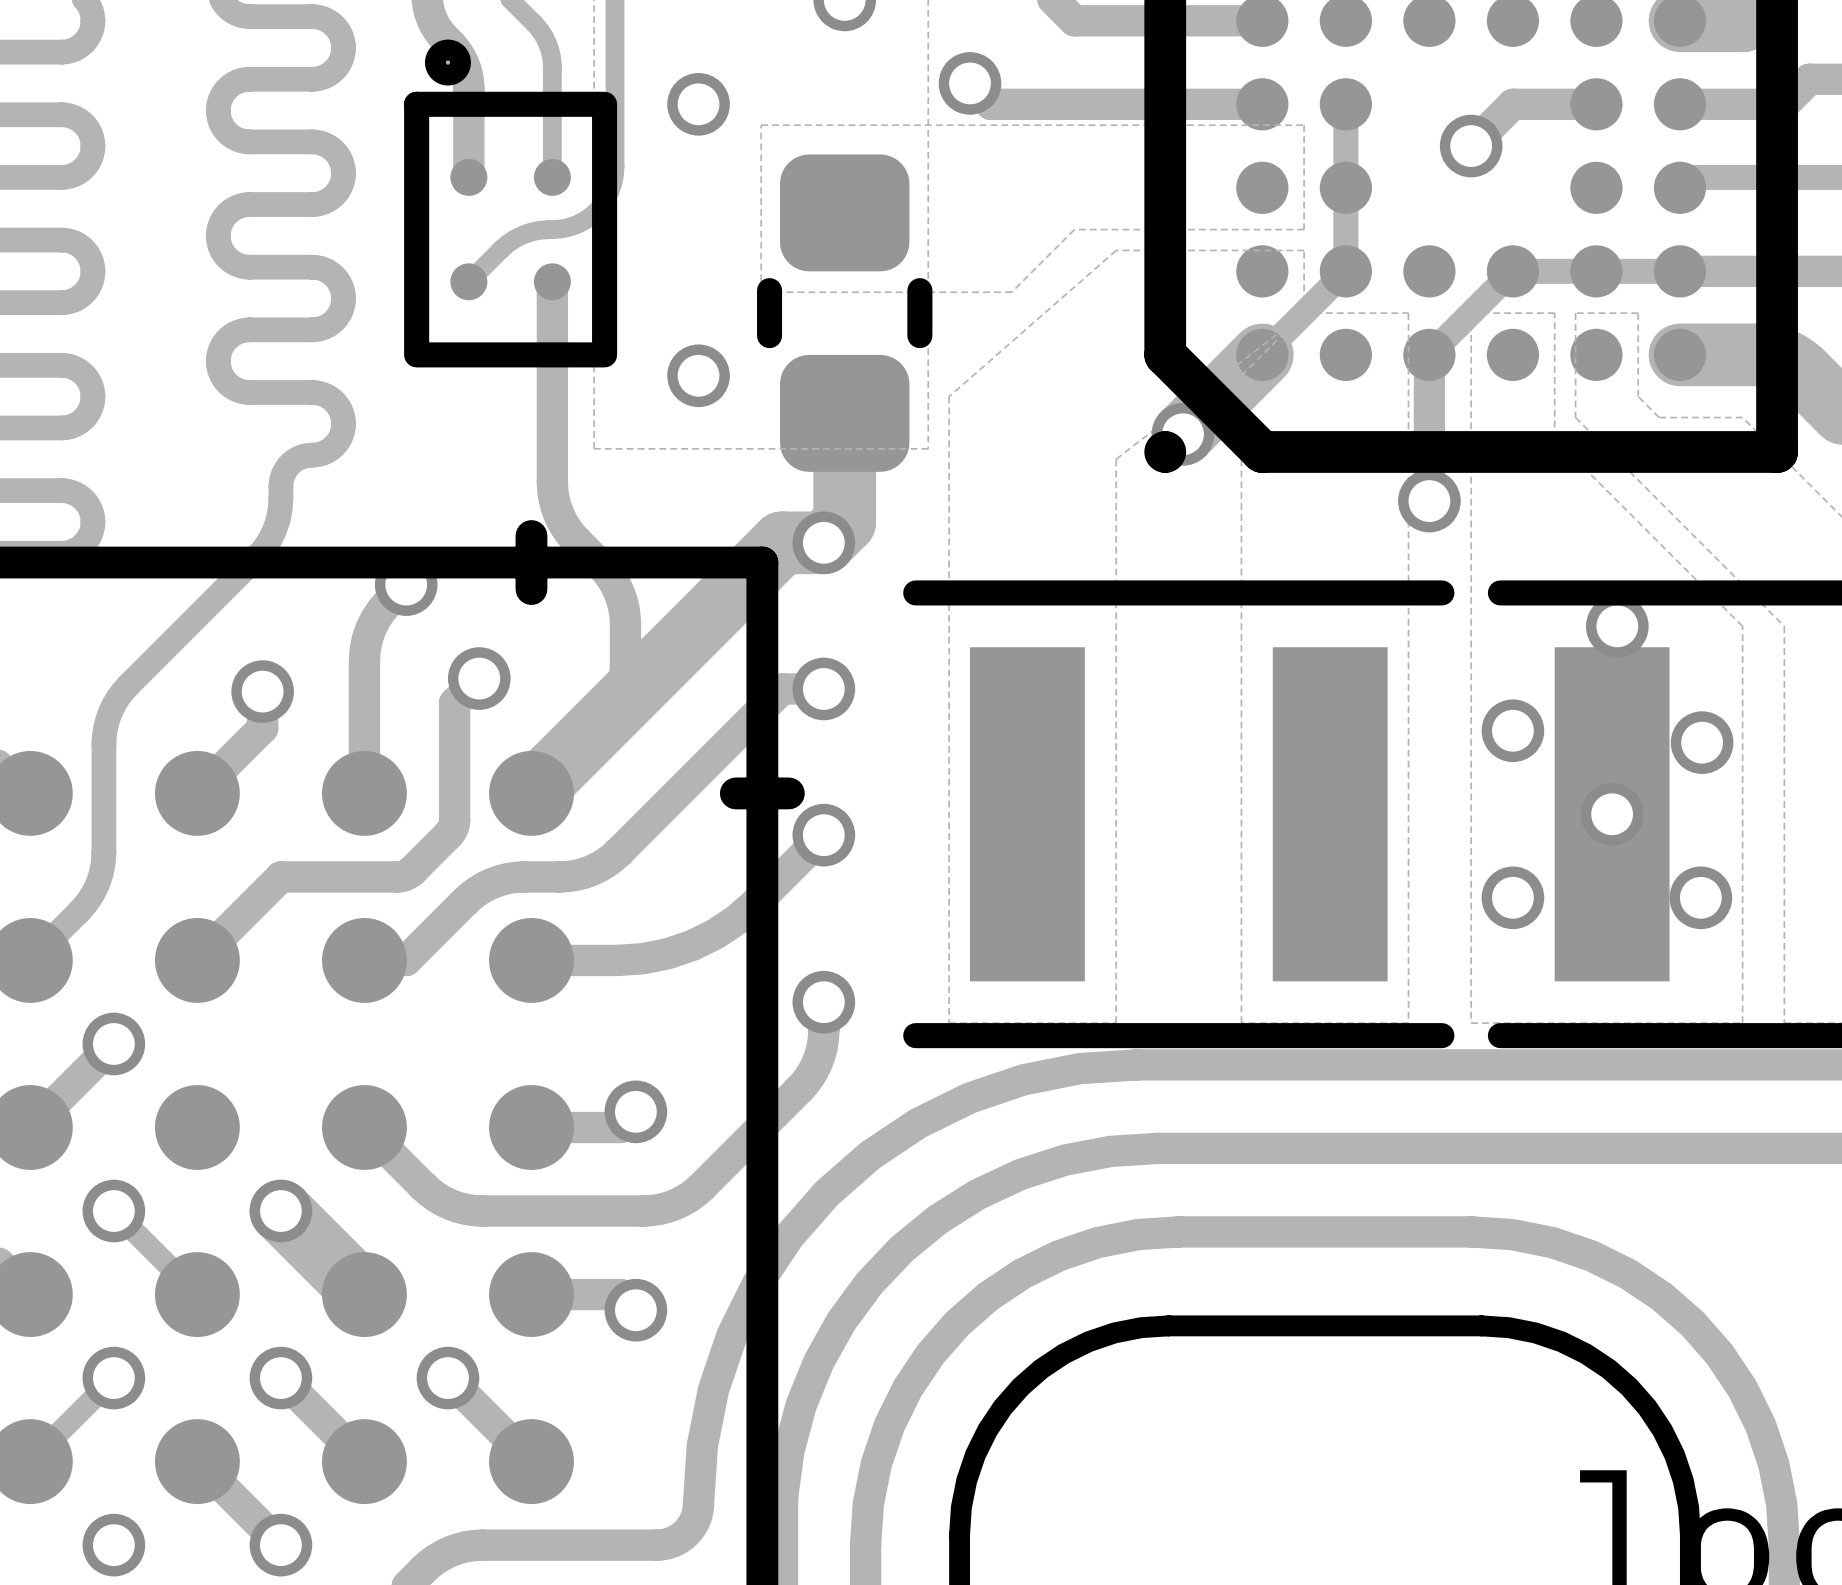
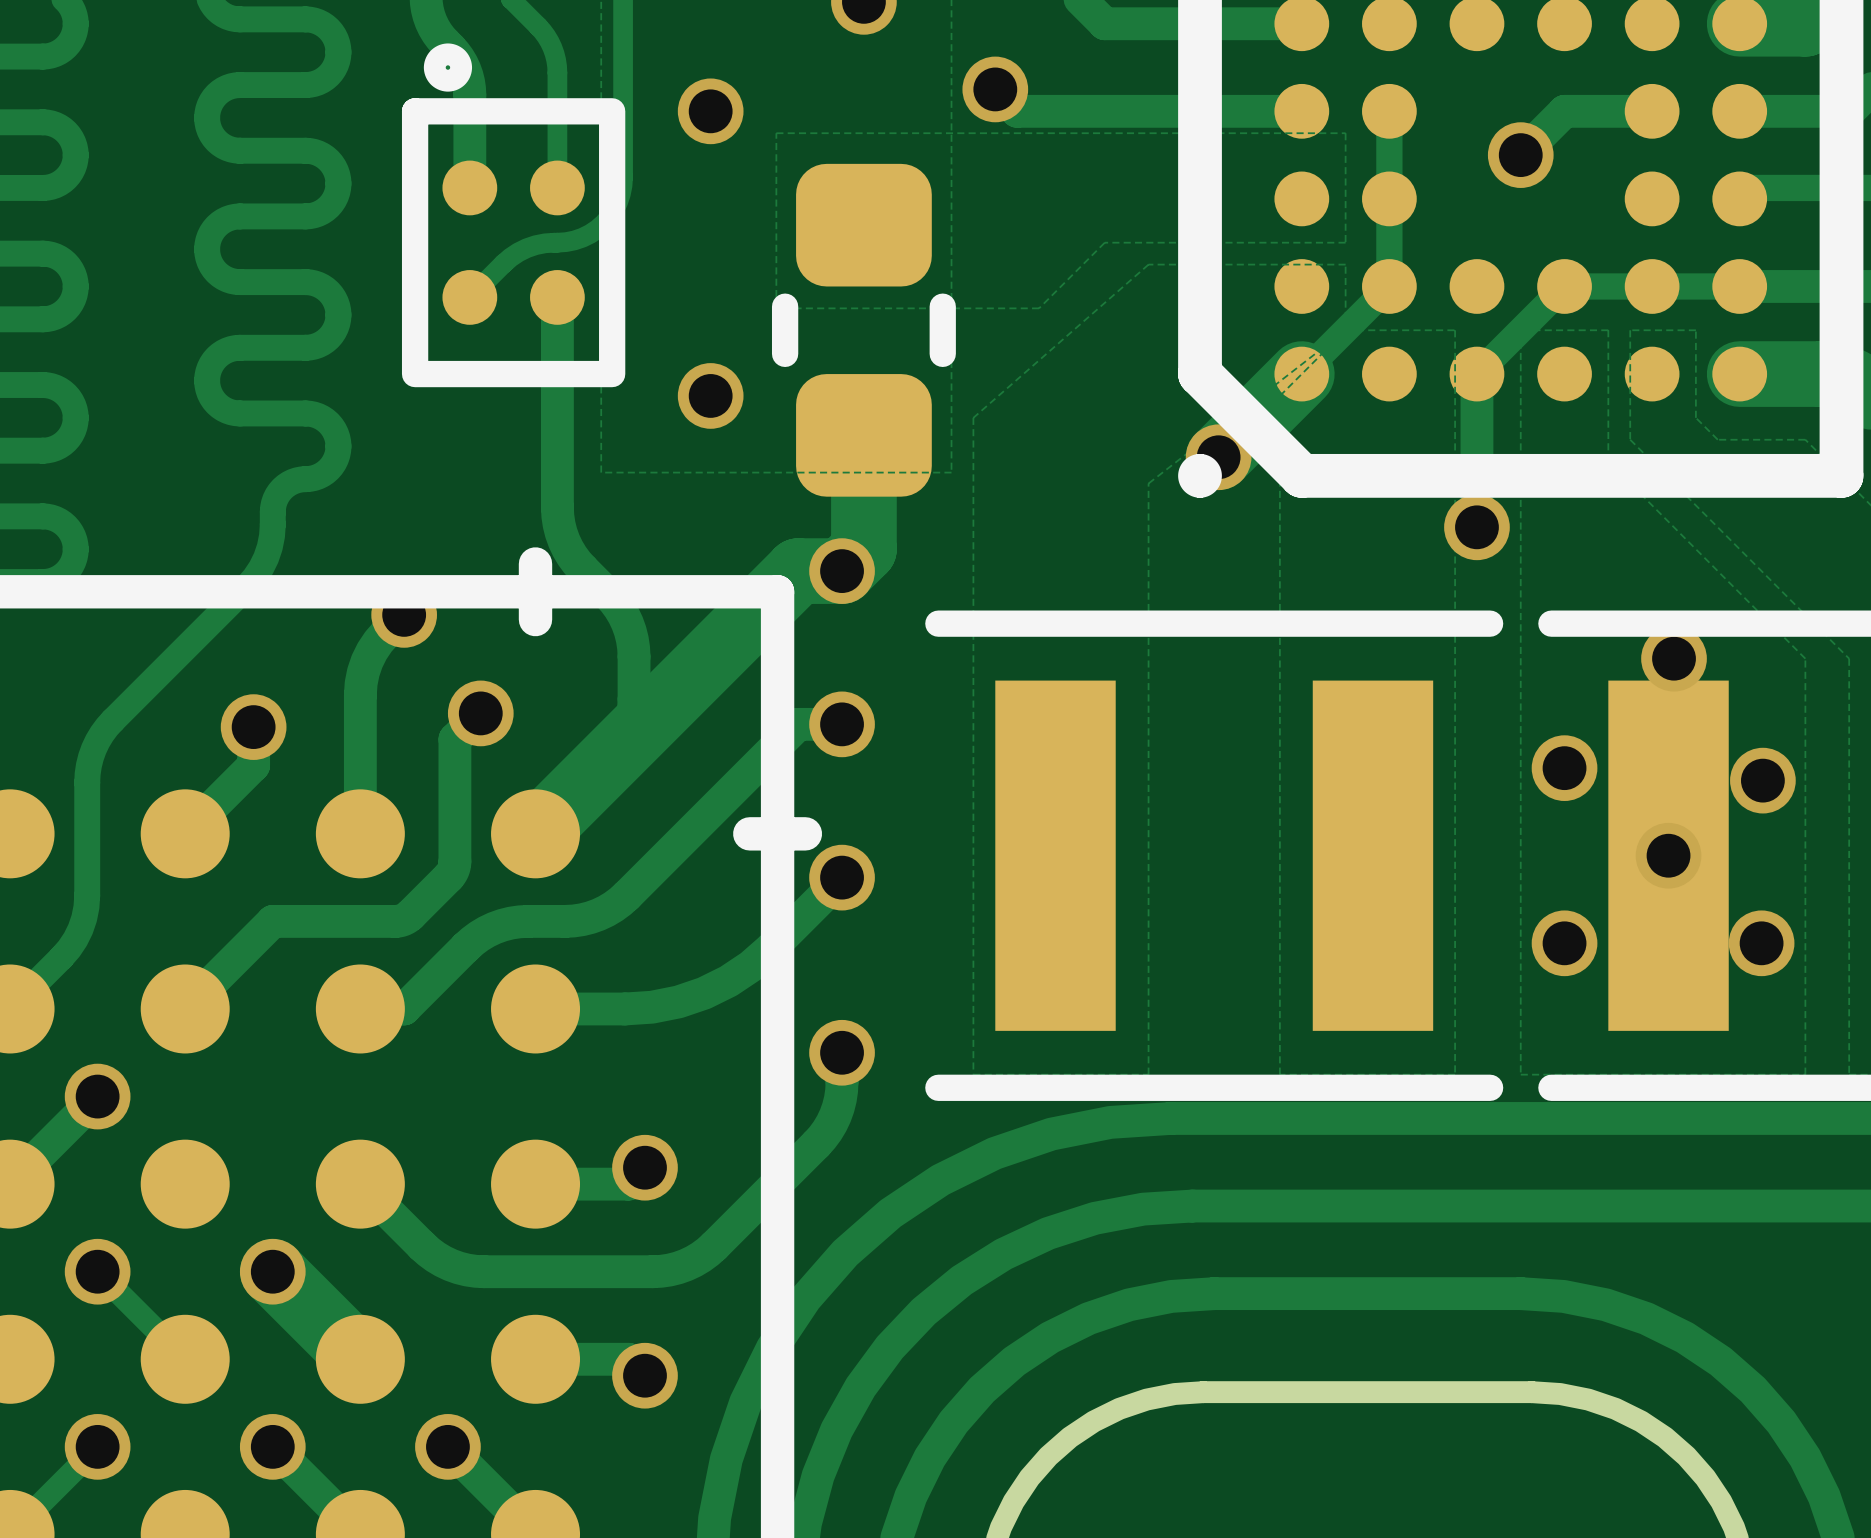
part footprint: [404, 39, 618, 368] -> [401, 43, 626, 388]

